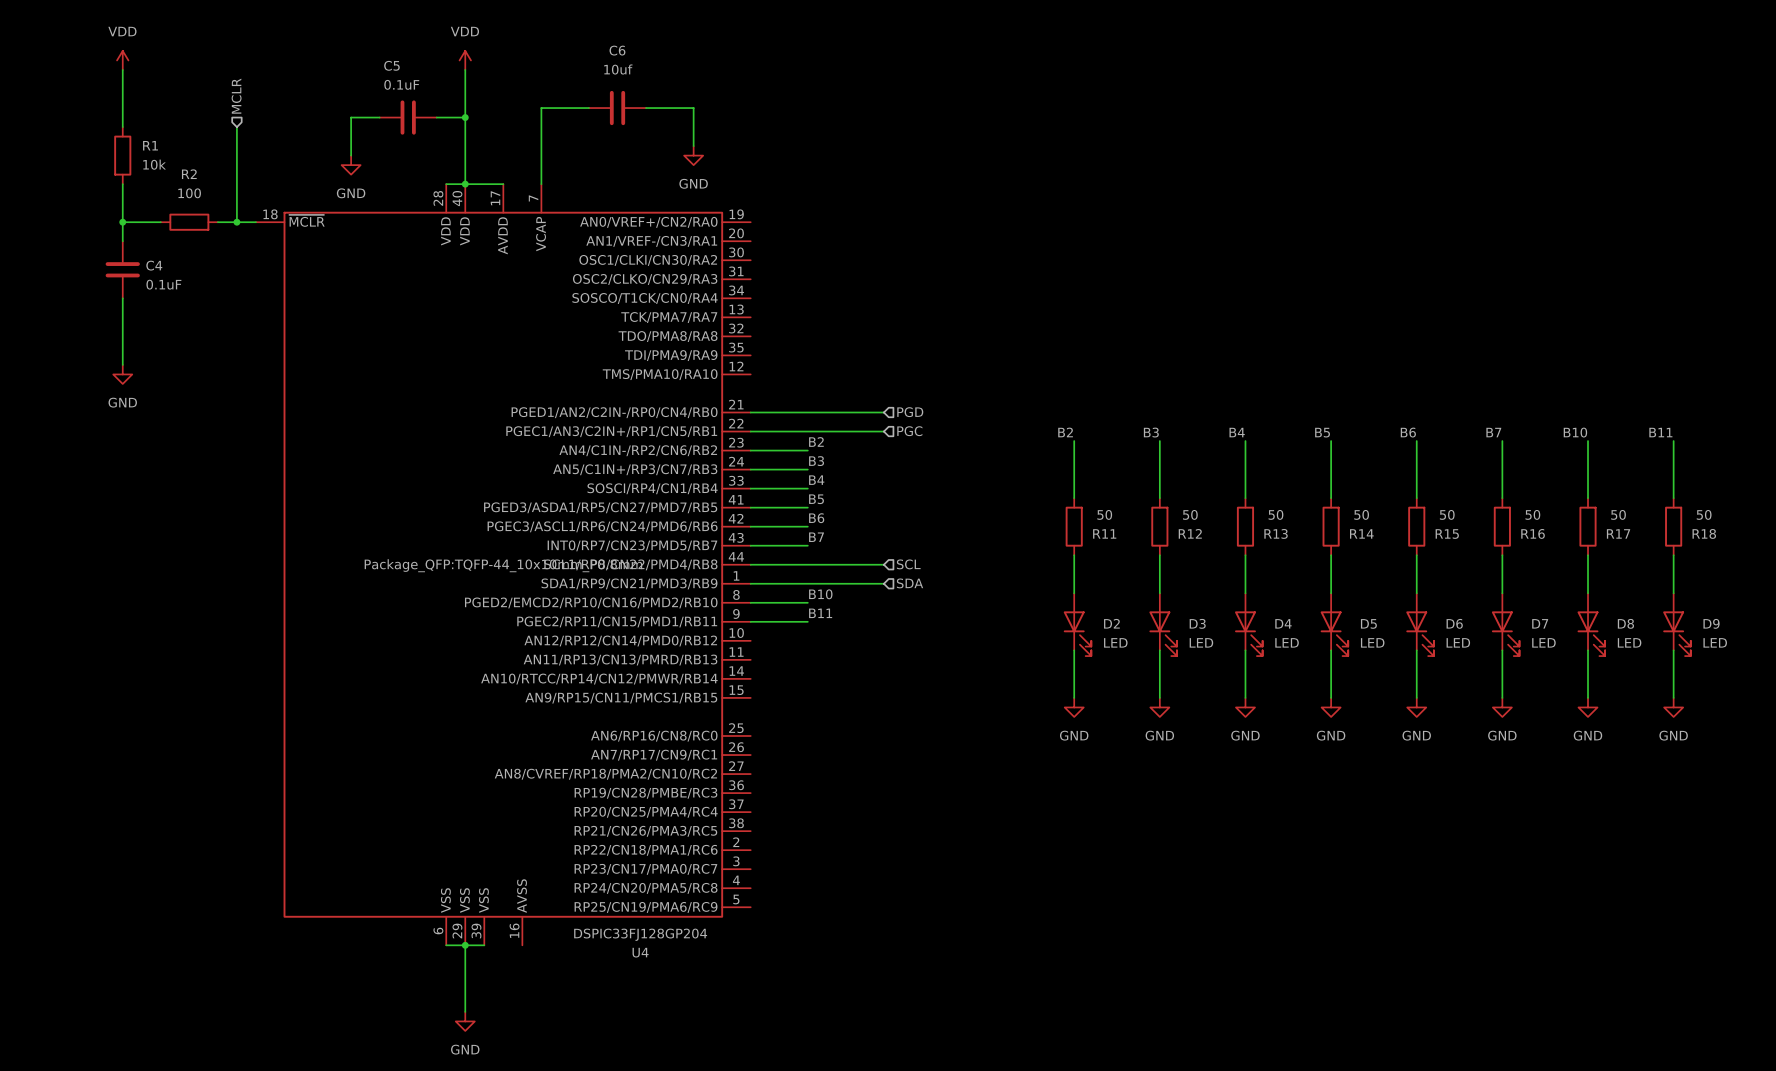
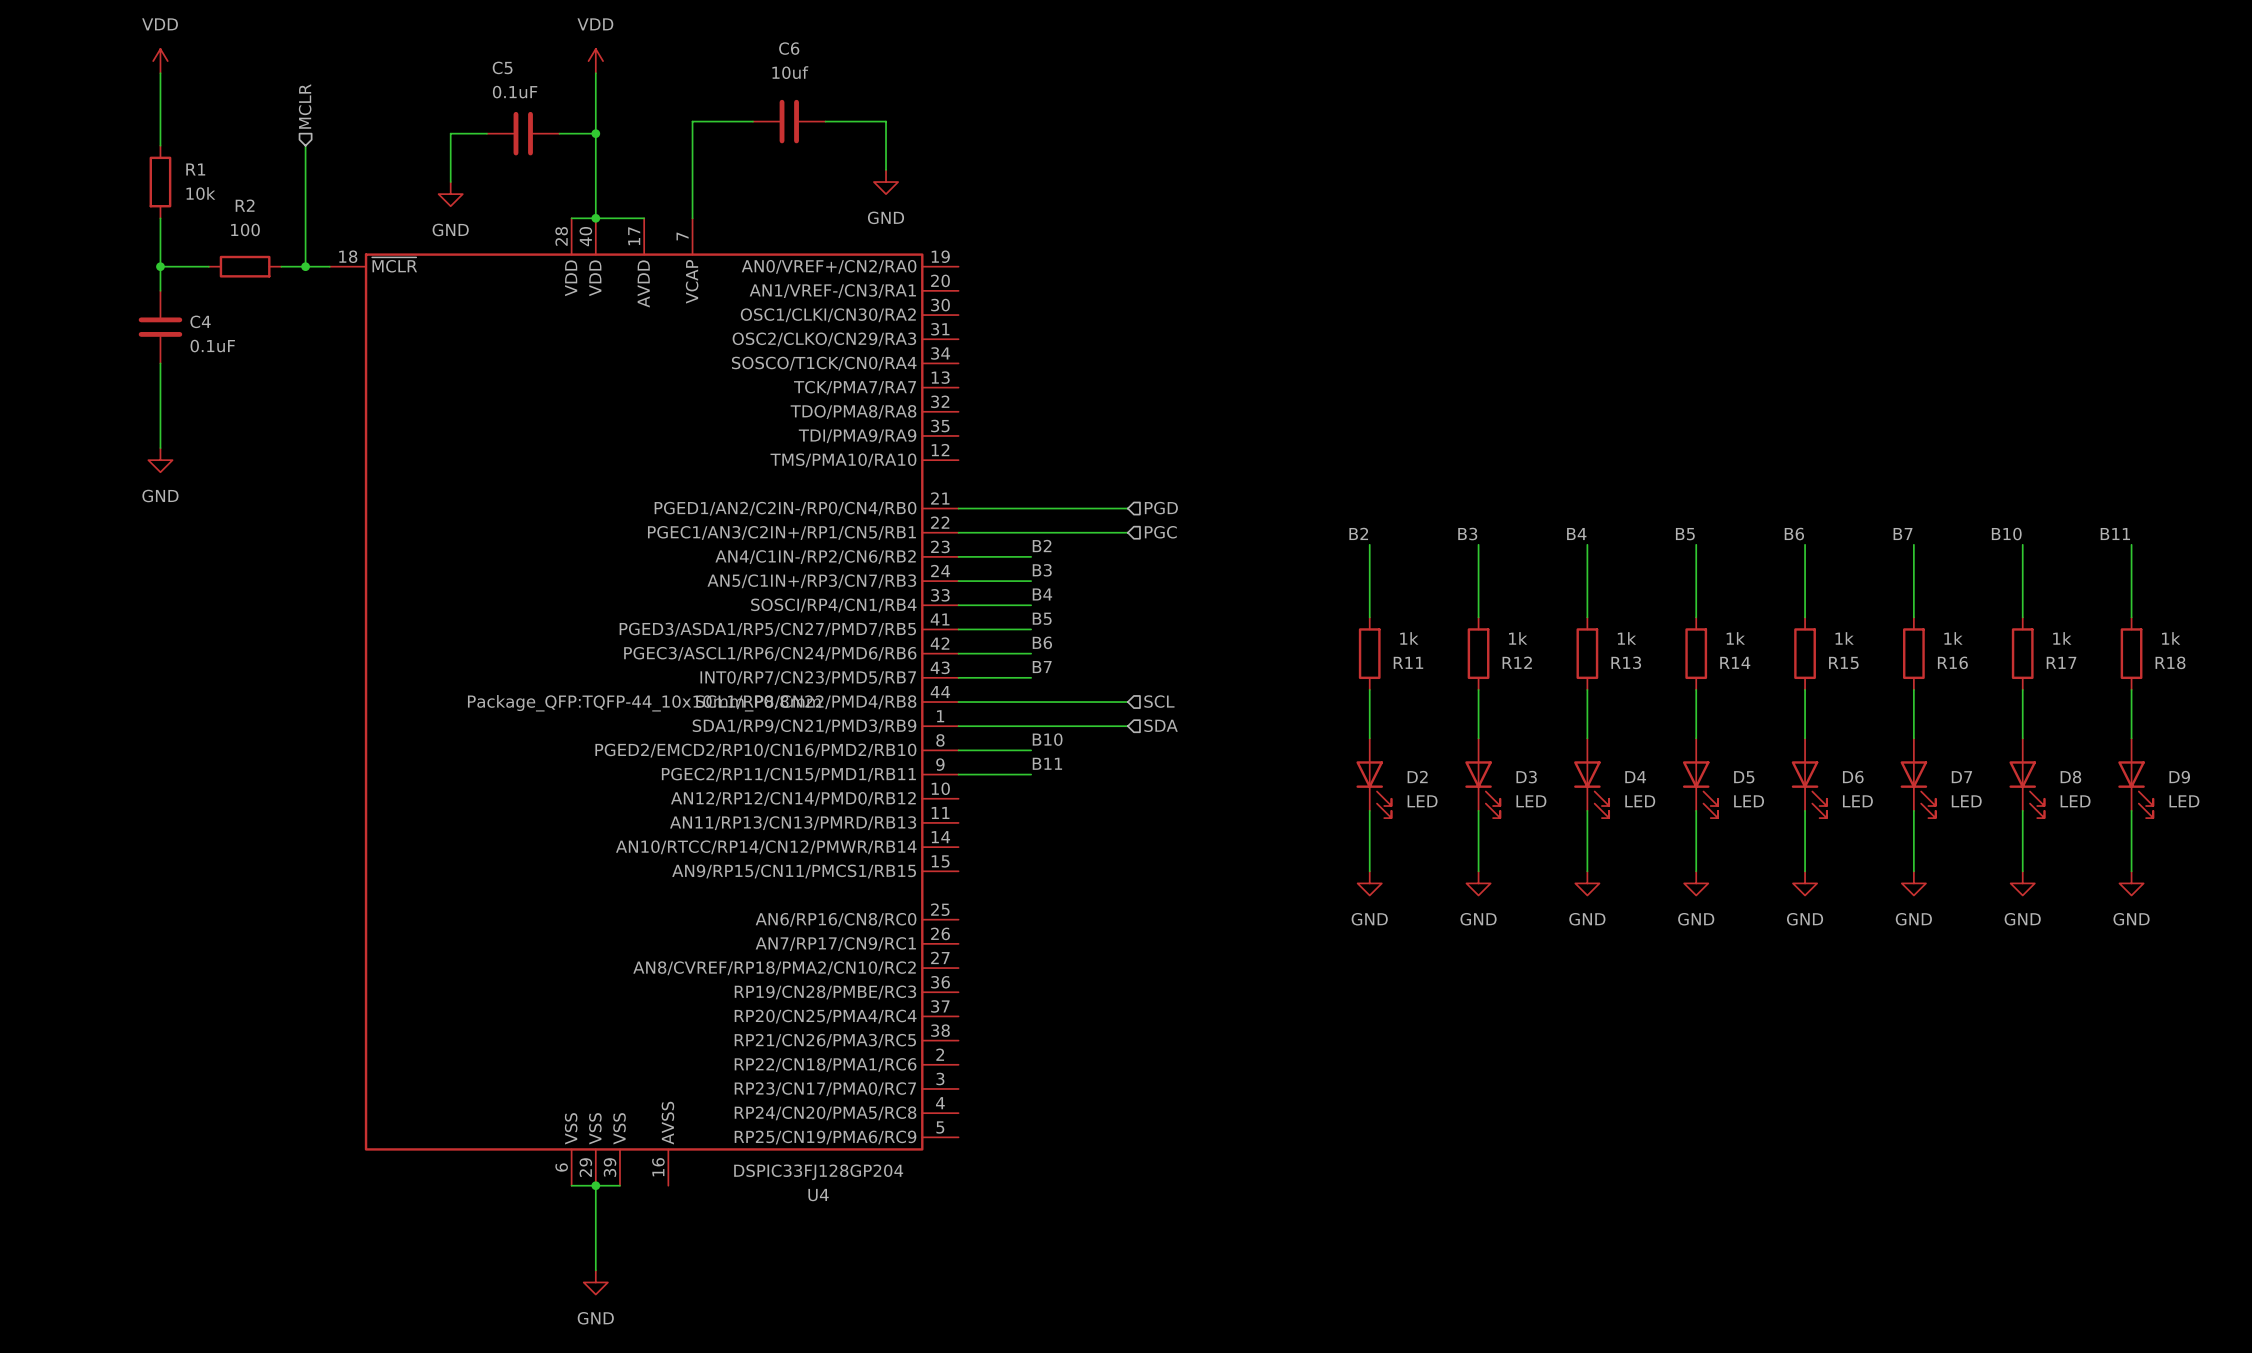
R11 value: 50 (1104, 514) -> 1k (1409, 638)
R12 value: 50 (1190, 514) -> 1k (1518, 638)
R13 value: 50 (1275, 514) -> 1k (1626, 638)
R14 value: 50 (1361, 514) -> 1k (1735, 638)
R15 value: 50 (1447, 514) -> 1k (1844, 638)
R16 value: 50 (1532, 514) -> 1k (1953, 638)
R17 value: 50 (1618, 514) -> 1k (2062, 638)
R18 value: 50 (1704, 514) -> 1k (2171, 638)

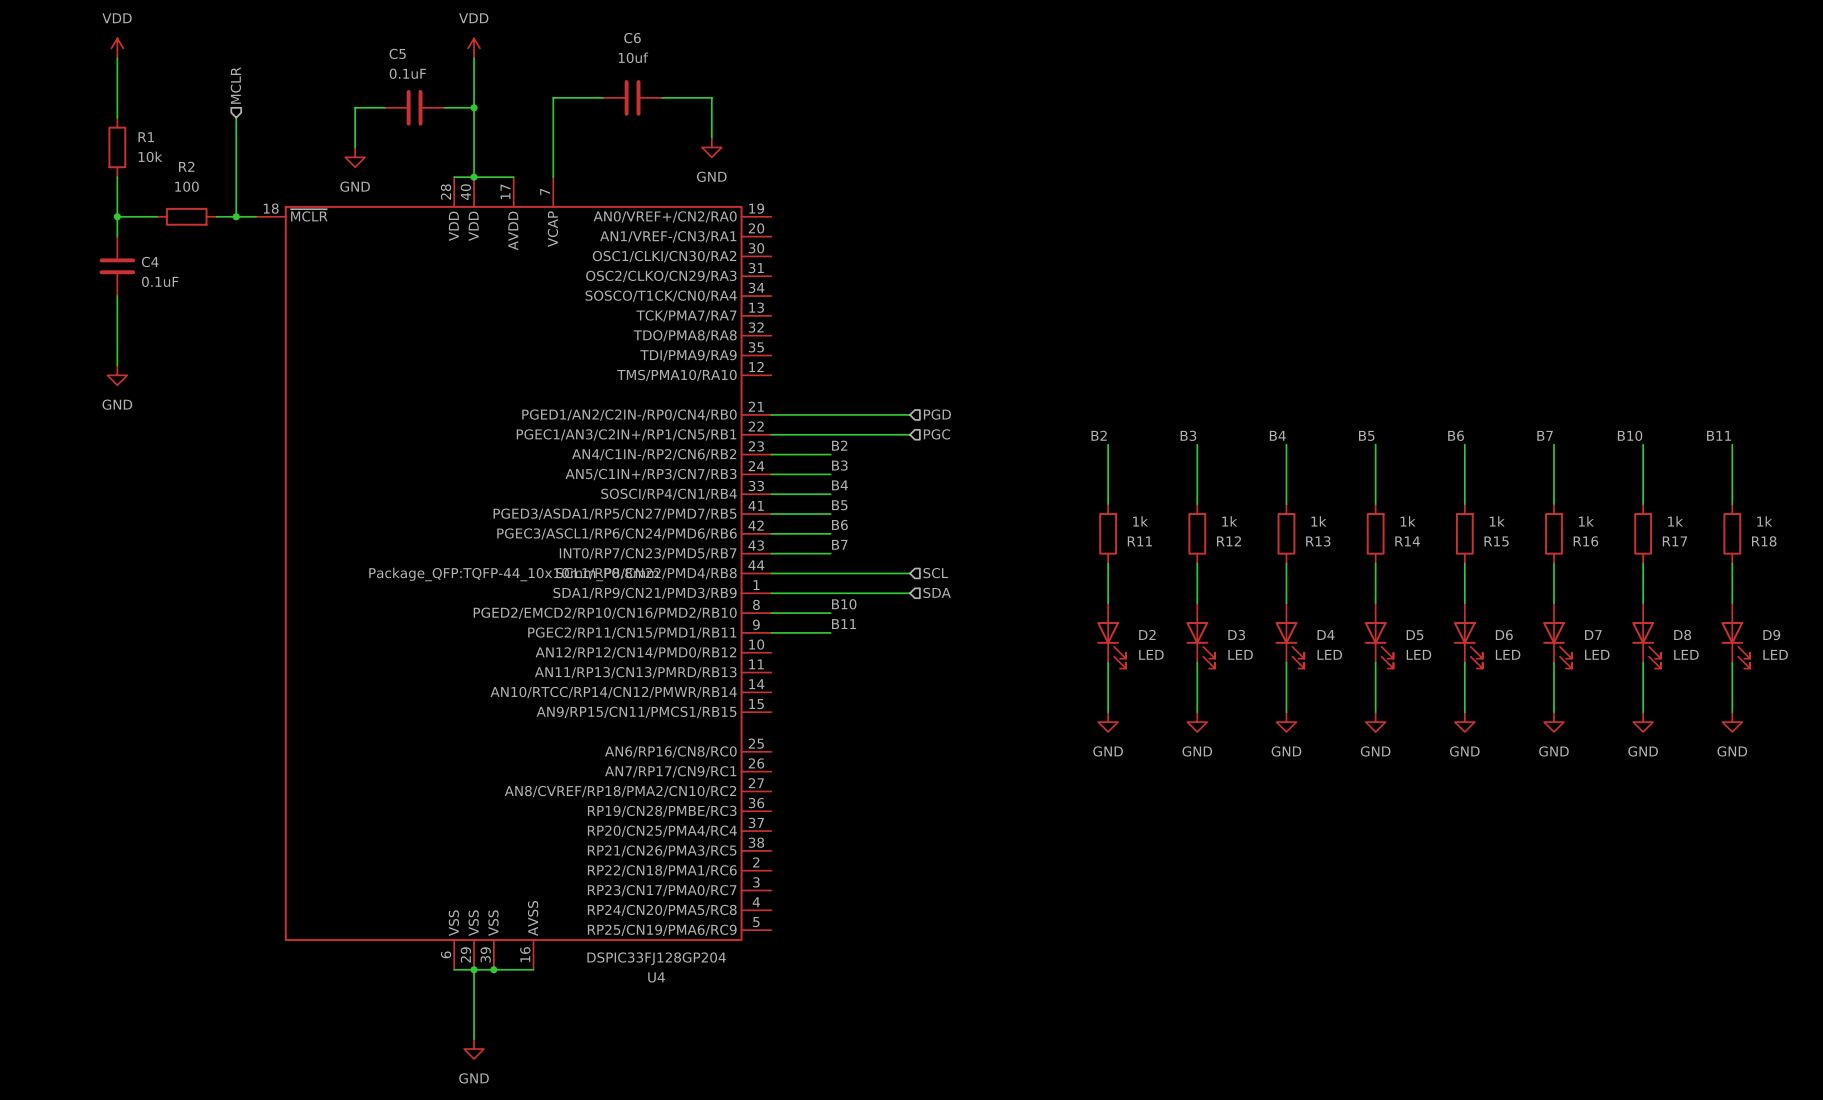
wire: none -> (493, 969) (533, 969)
junction: none -> (493, 969)

